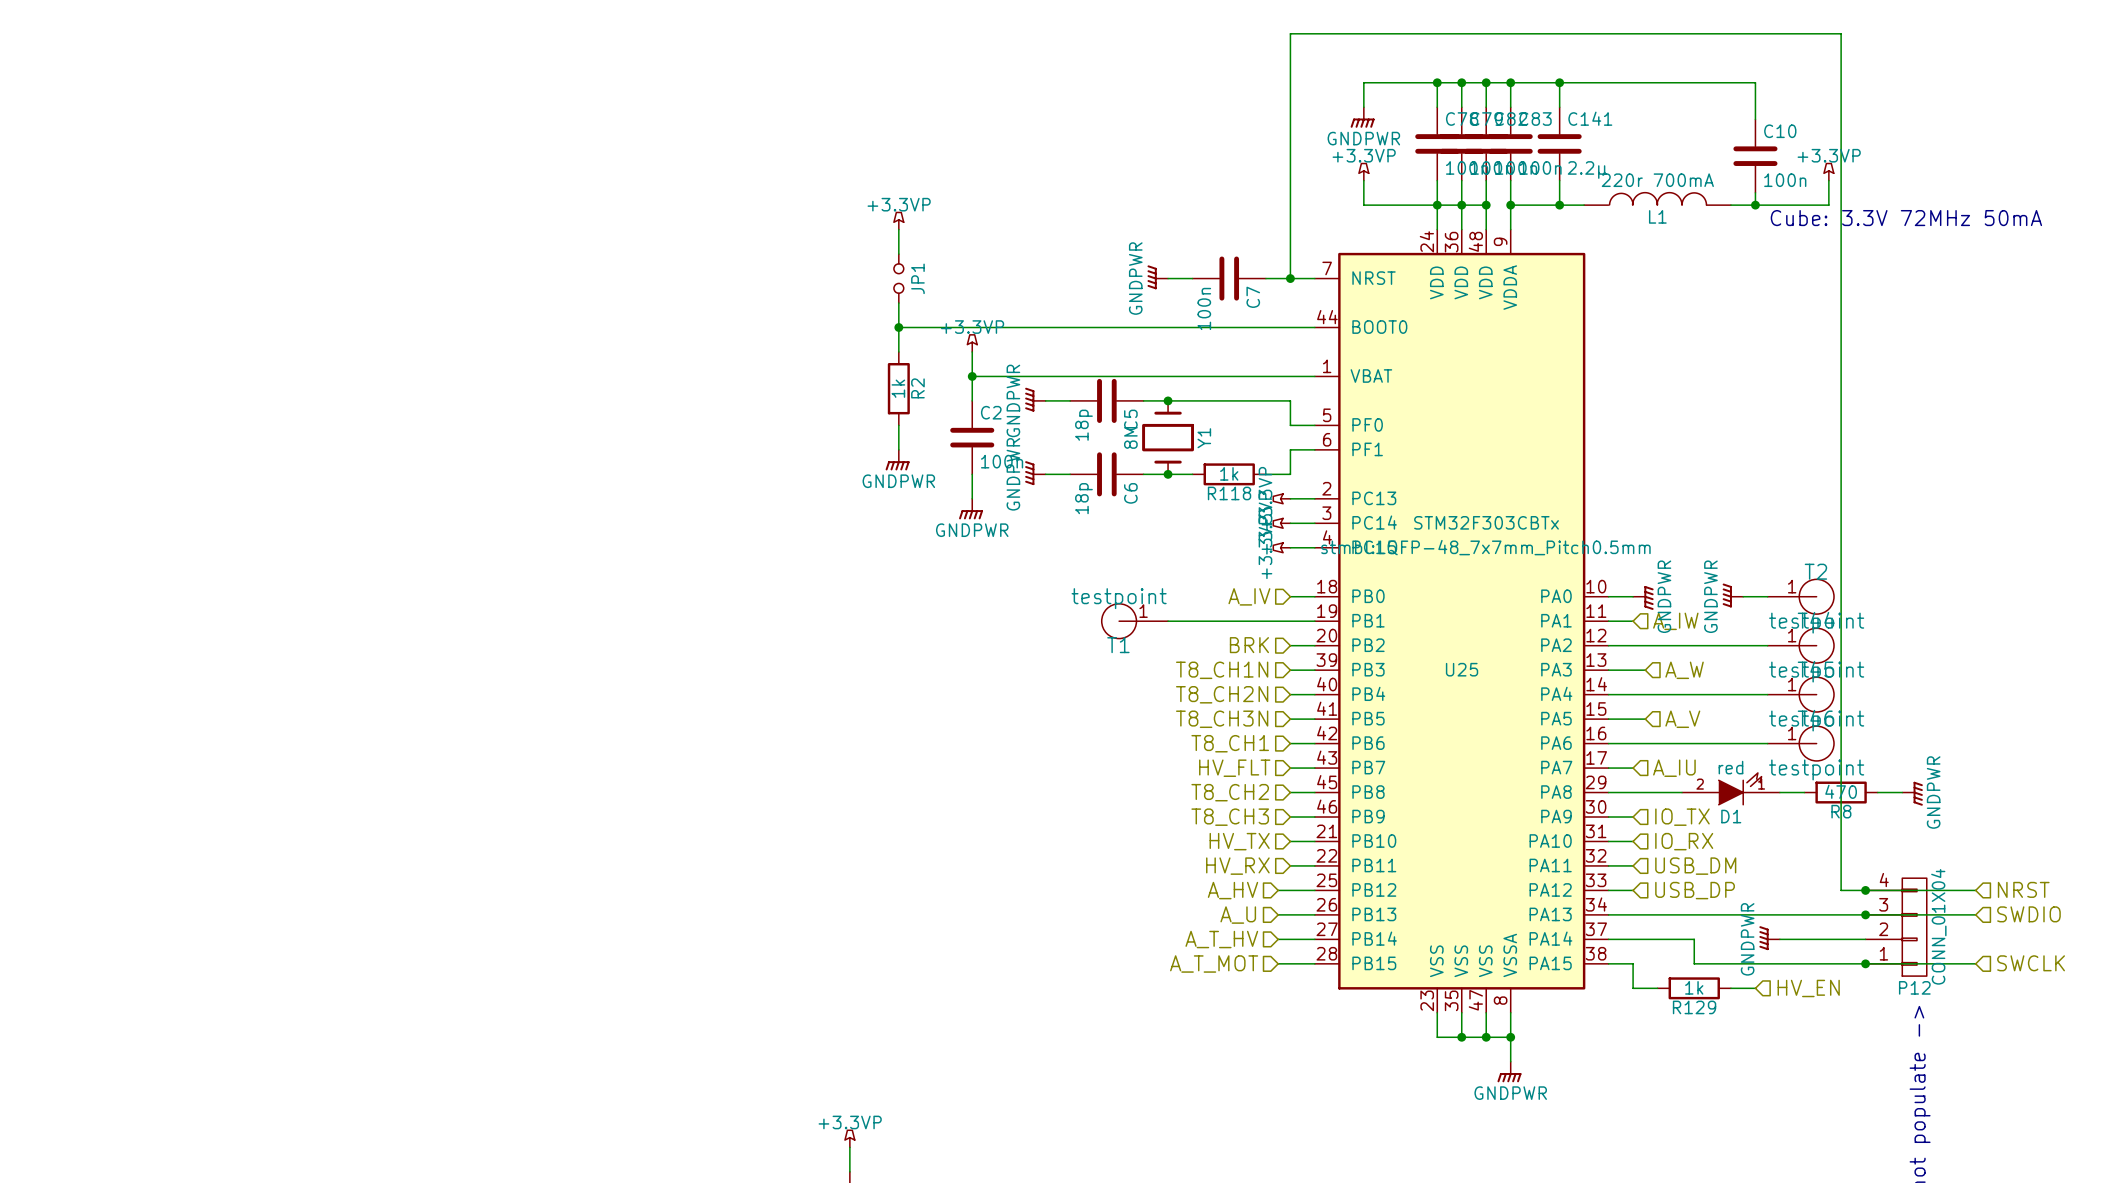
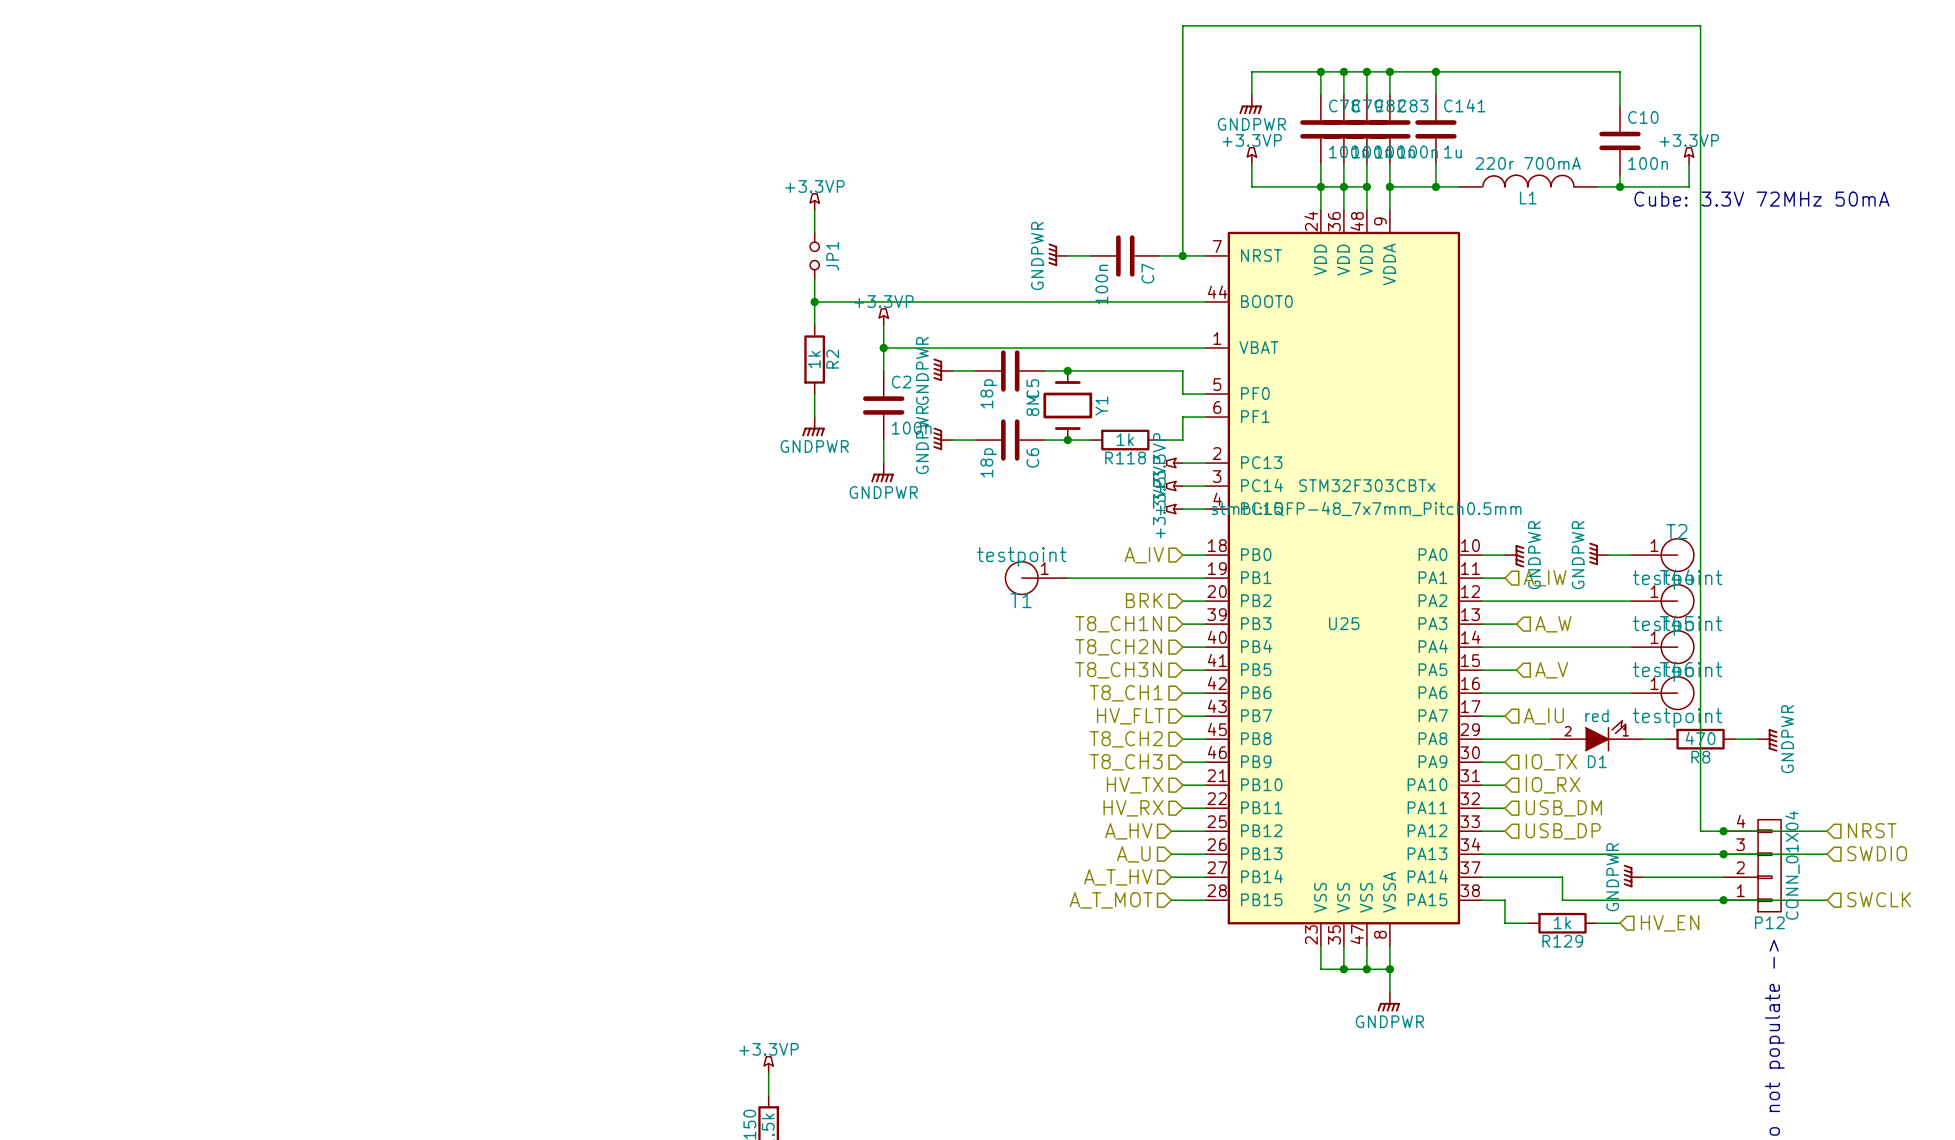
C141 value: 2.2µ (1587, 170) -> 1u (1453, 151)

